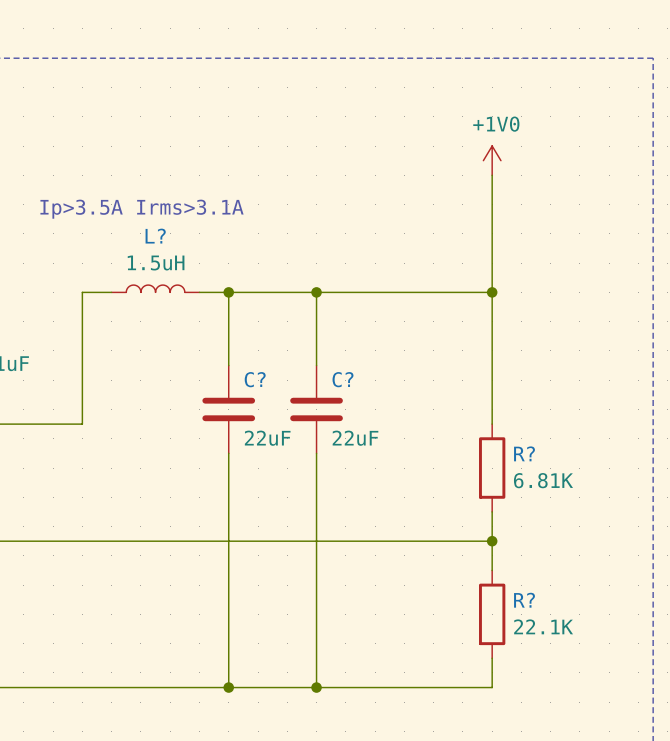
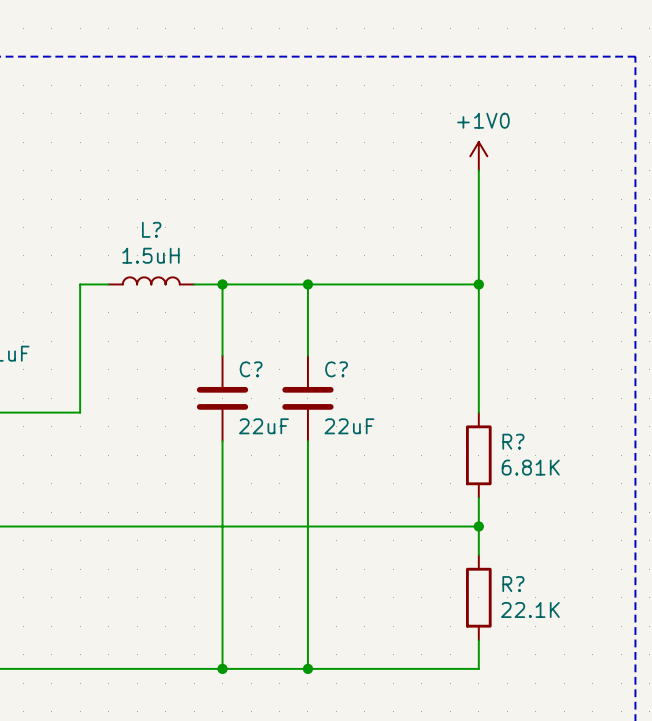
text: Ip>3.5A Irms>3.1A (142, 209) -> none

